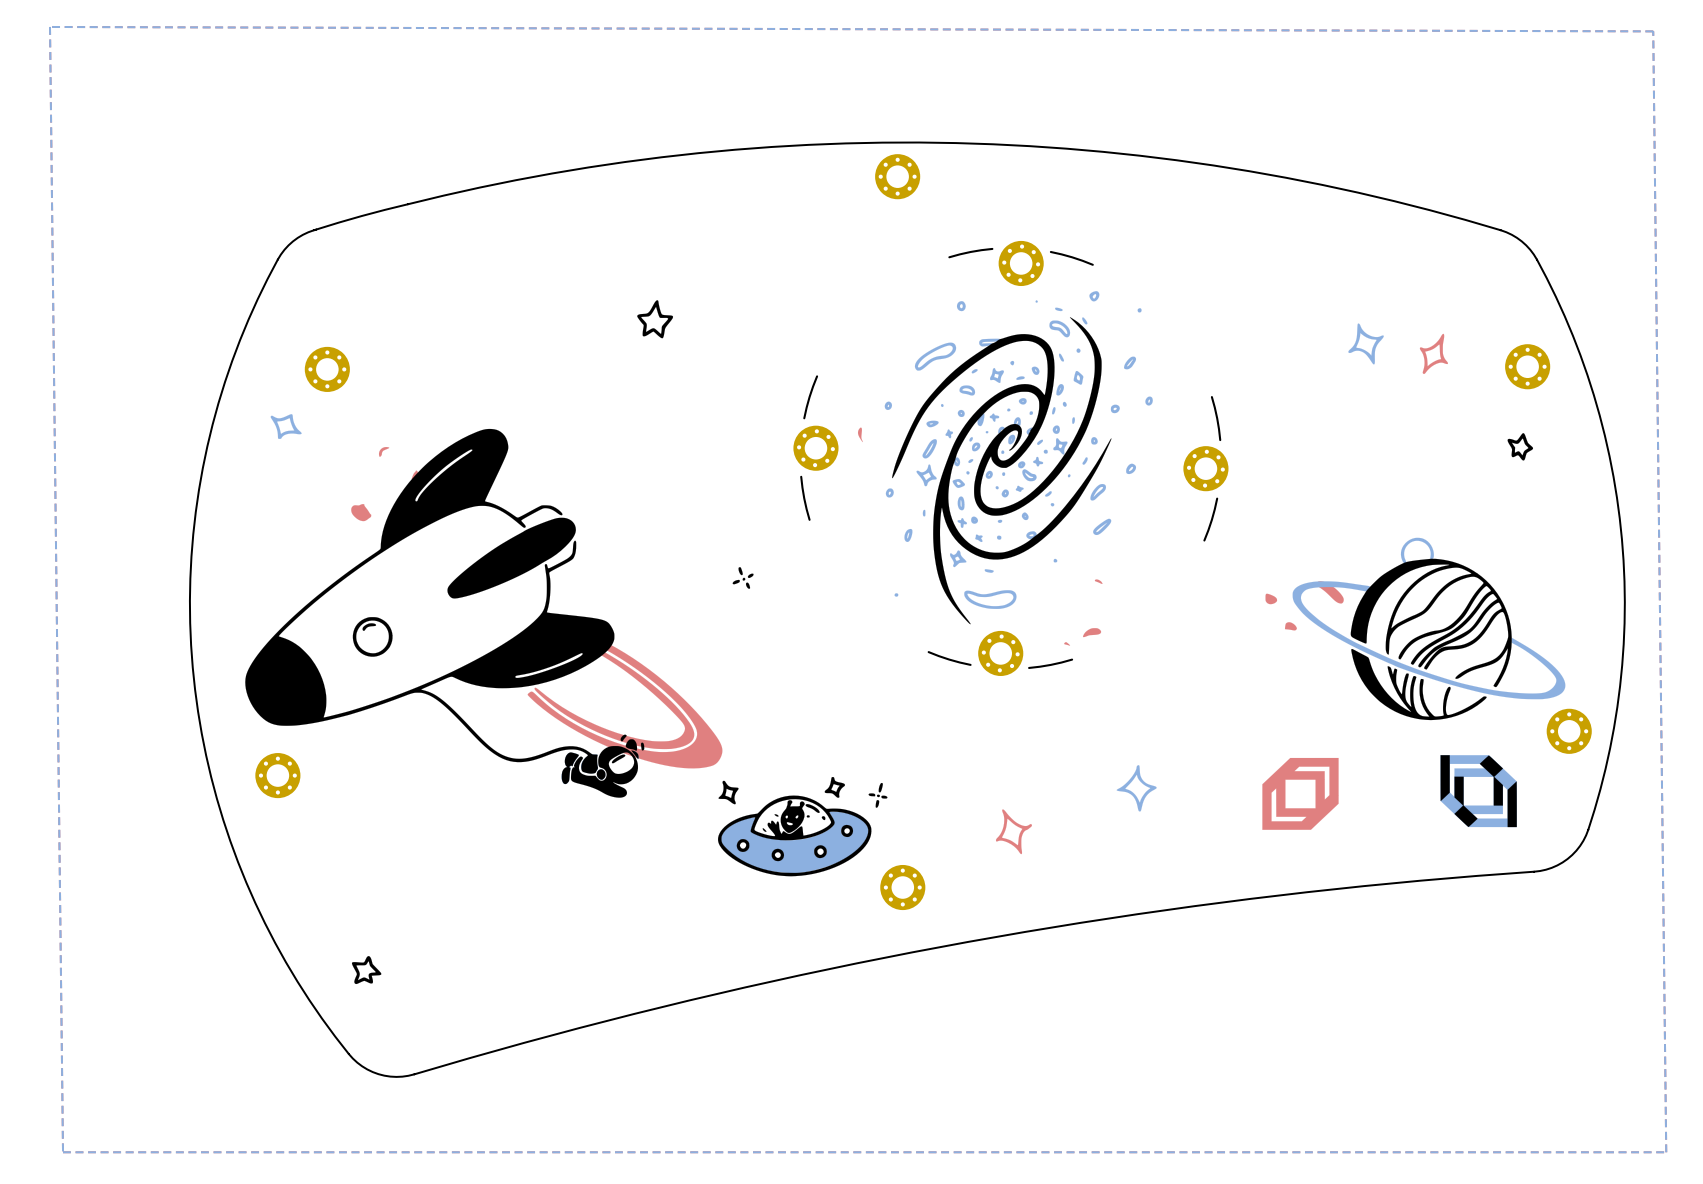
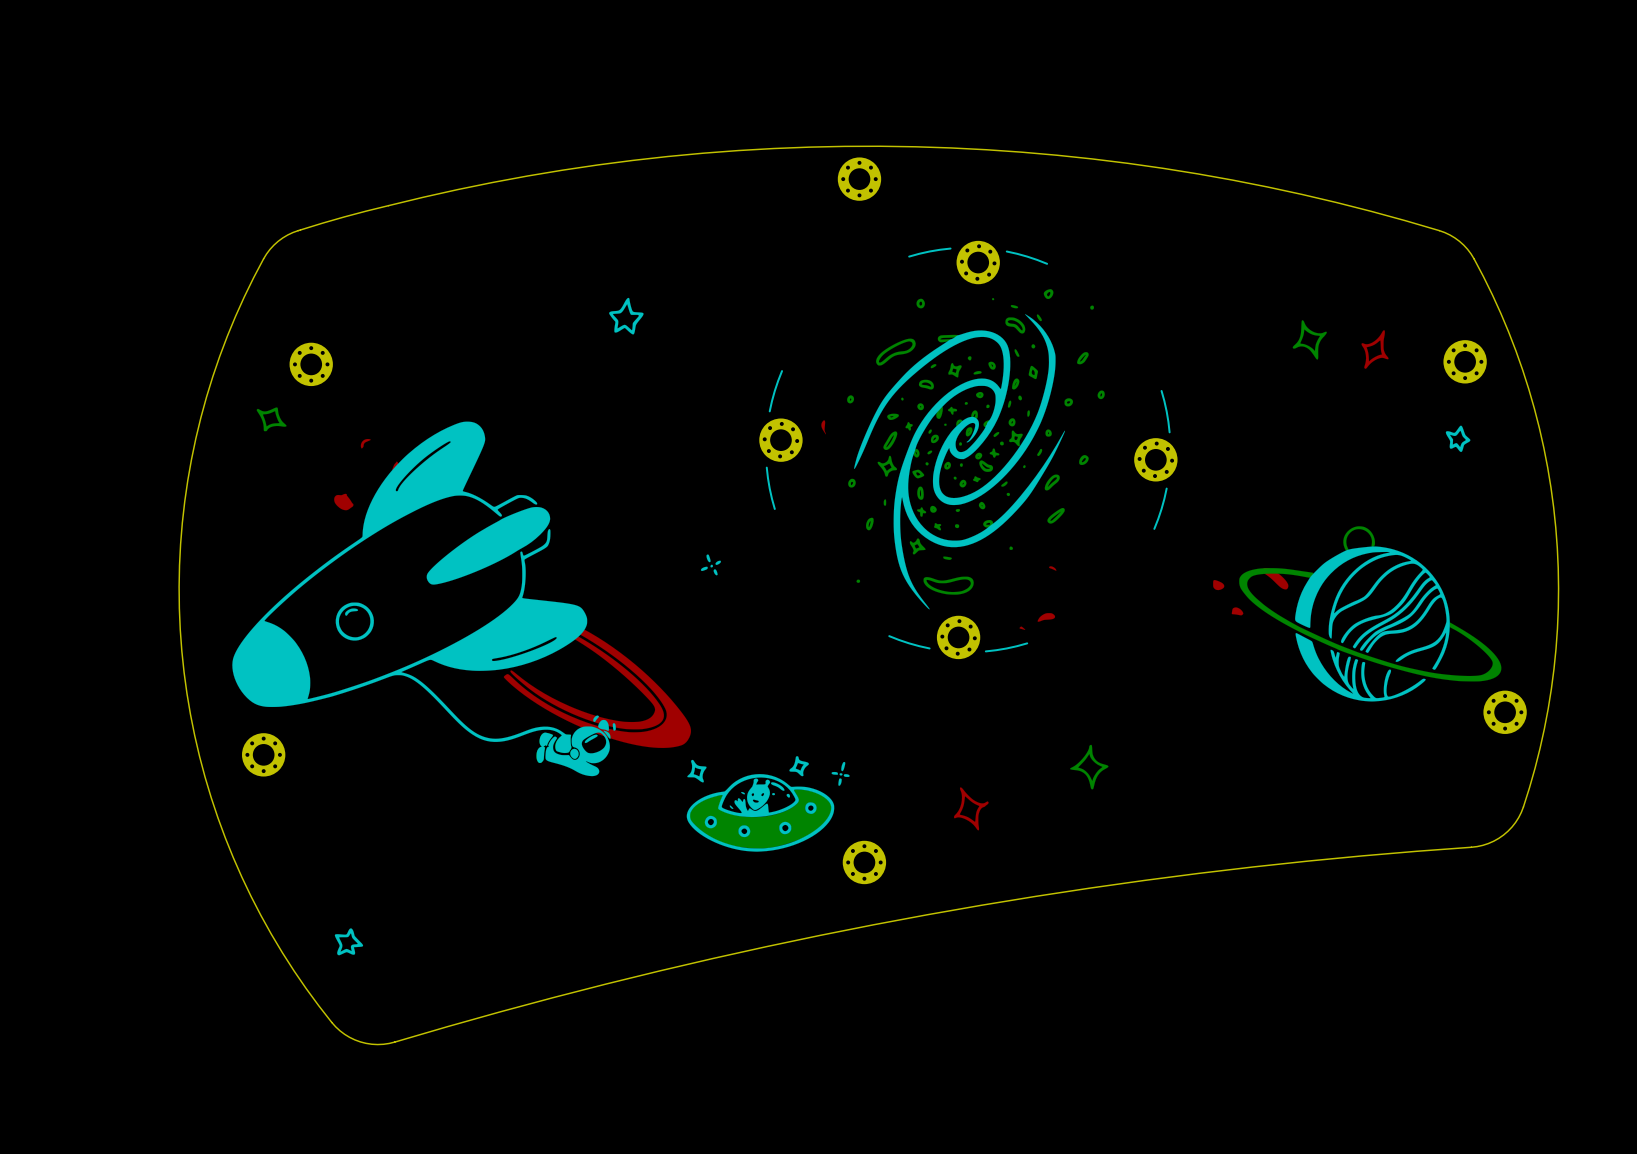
bottom zone outline: (50, 26) (1653, 31) (1666, 1152) (63, 1152) (50, 26) -> none
drawing: [1440, 755, 1517, 828] -> none
drawing: [1262, 757, 1339, 830] -> none

